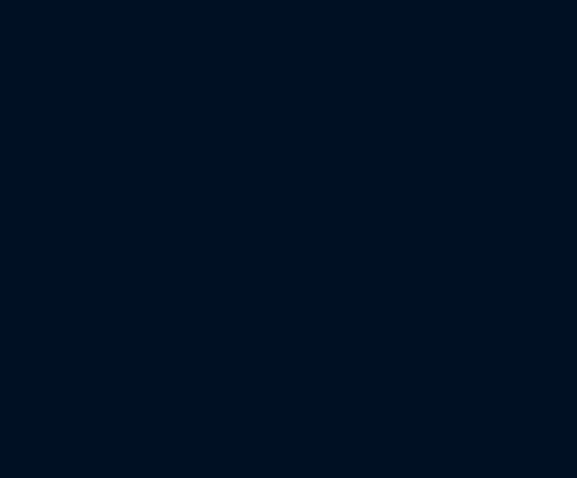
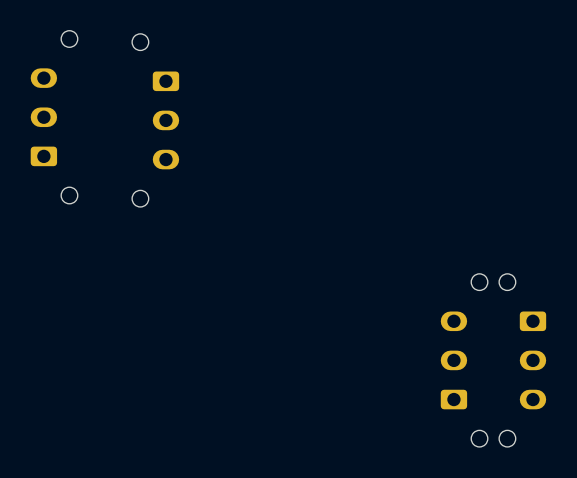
part: none -> (54, 117)
part: none -> (155, 120)
part: none -> (464, 360)
part: none -> (522, 360)

